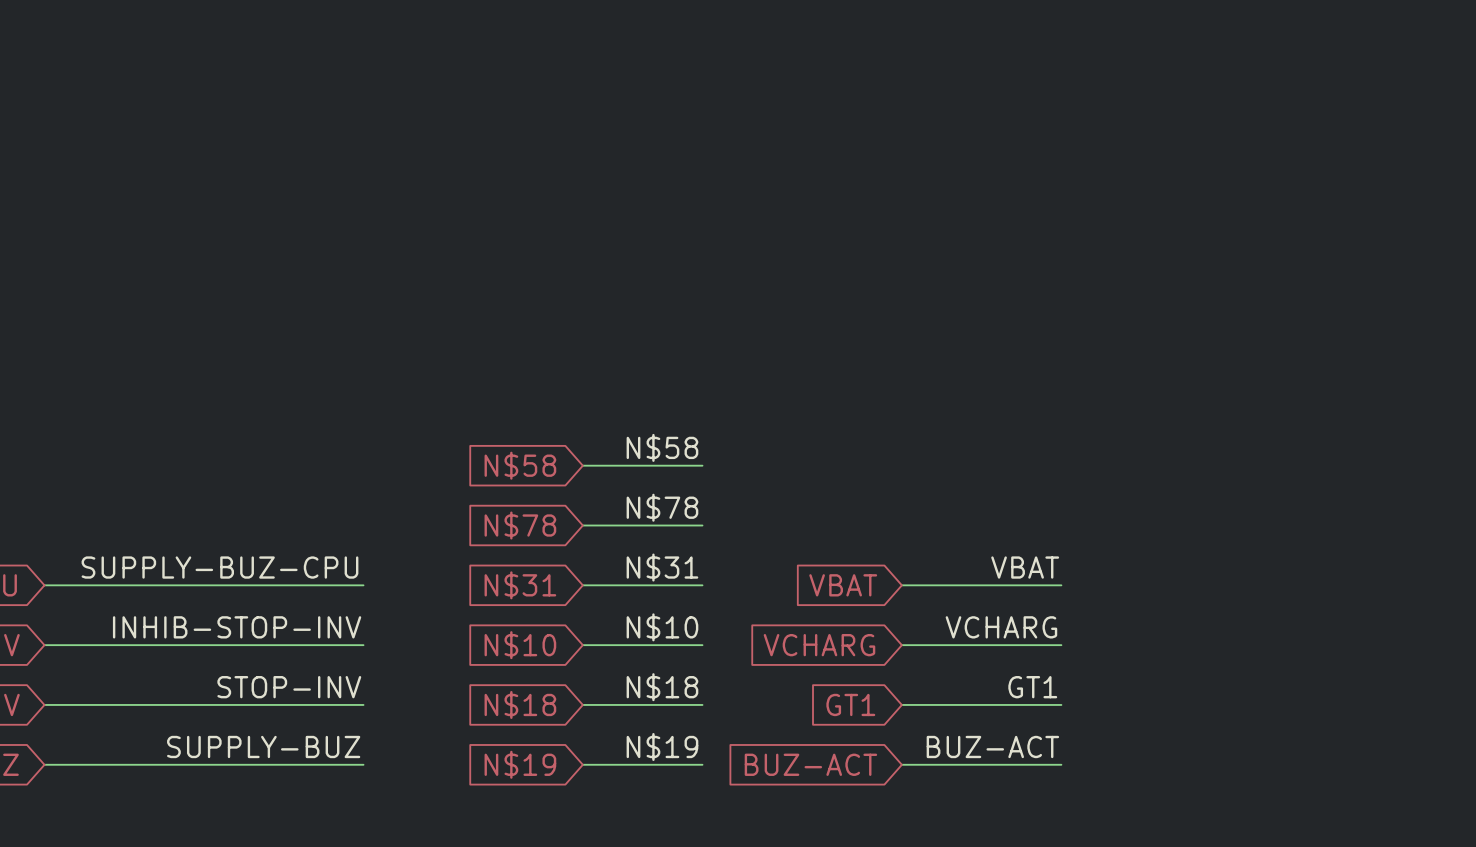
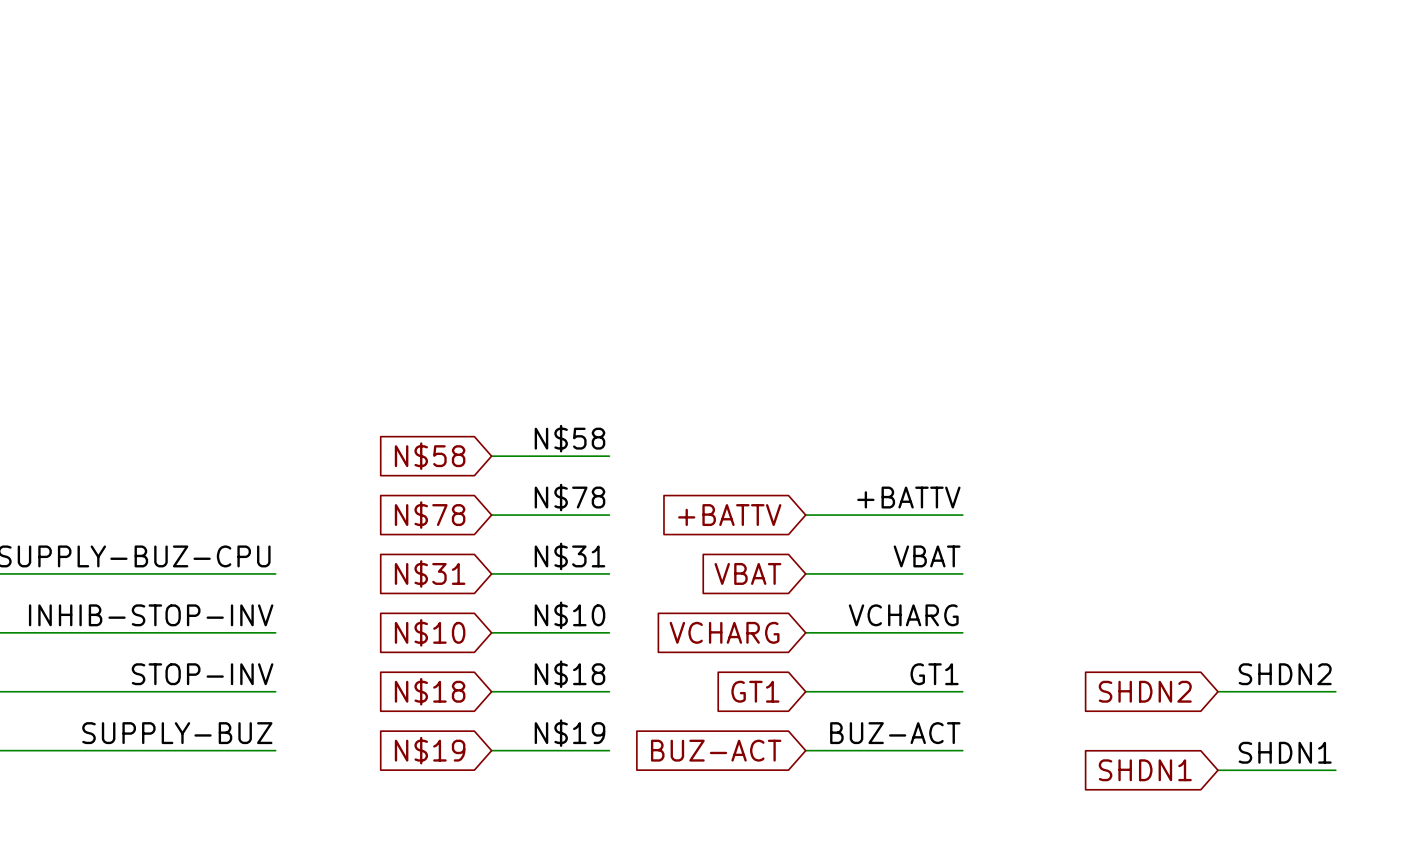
label: none -> +BATTV (908, 497)
global label: none -> +BATTV (729, 515)
wire: none -> (805, 515) (962, 515)
label: none -> SHDN2 (1285, 674)
global label: none -> SHDN2 (1145, 691)
wire: none -> (1217, 691) (1335, 691)
label: none -> SHDN1 (1285, 752)
global label: none -> SHDN1 (1145, 770)
wire: none -> (1217, 770) (1335, 770)

